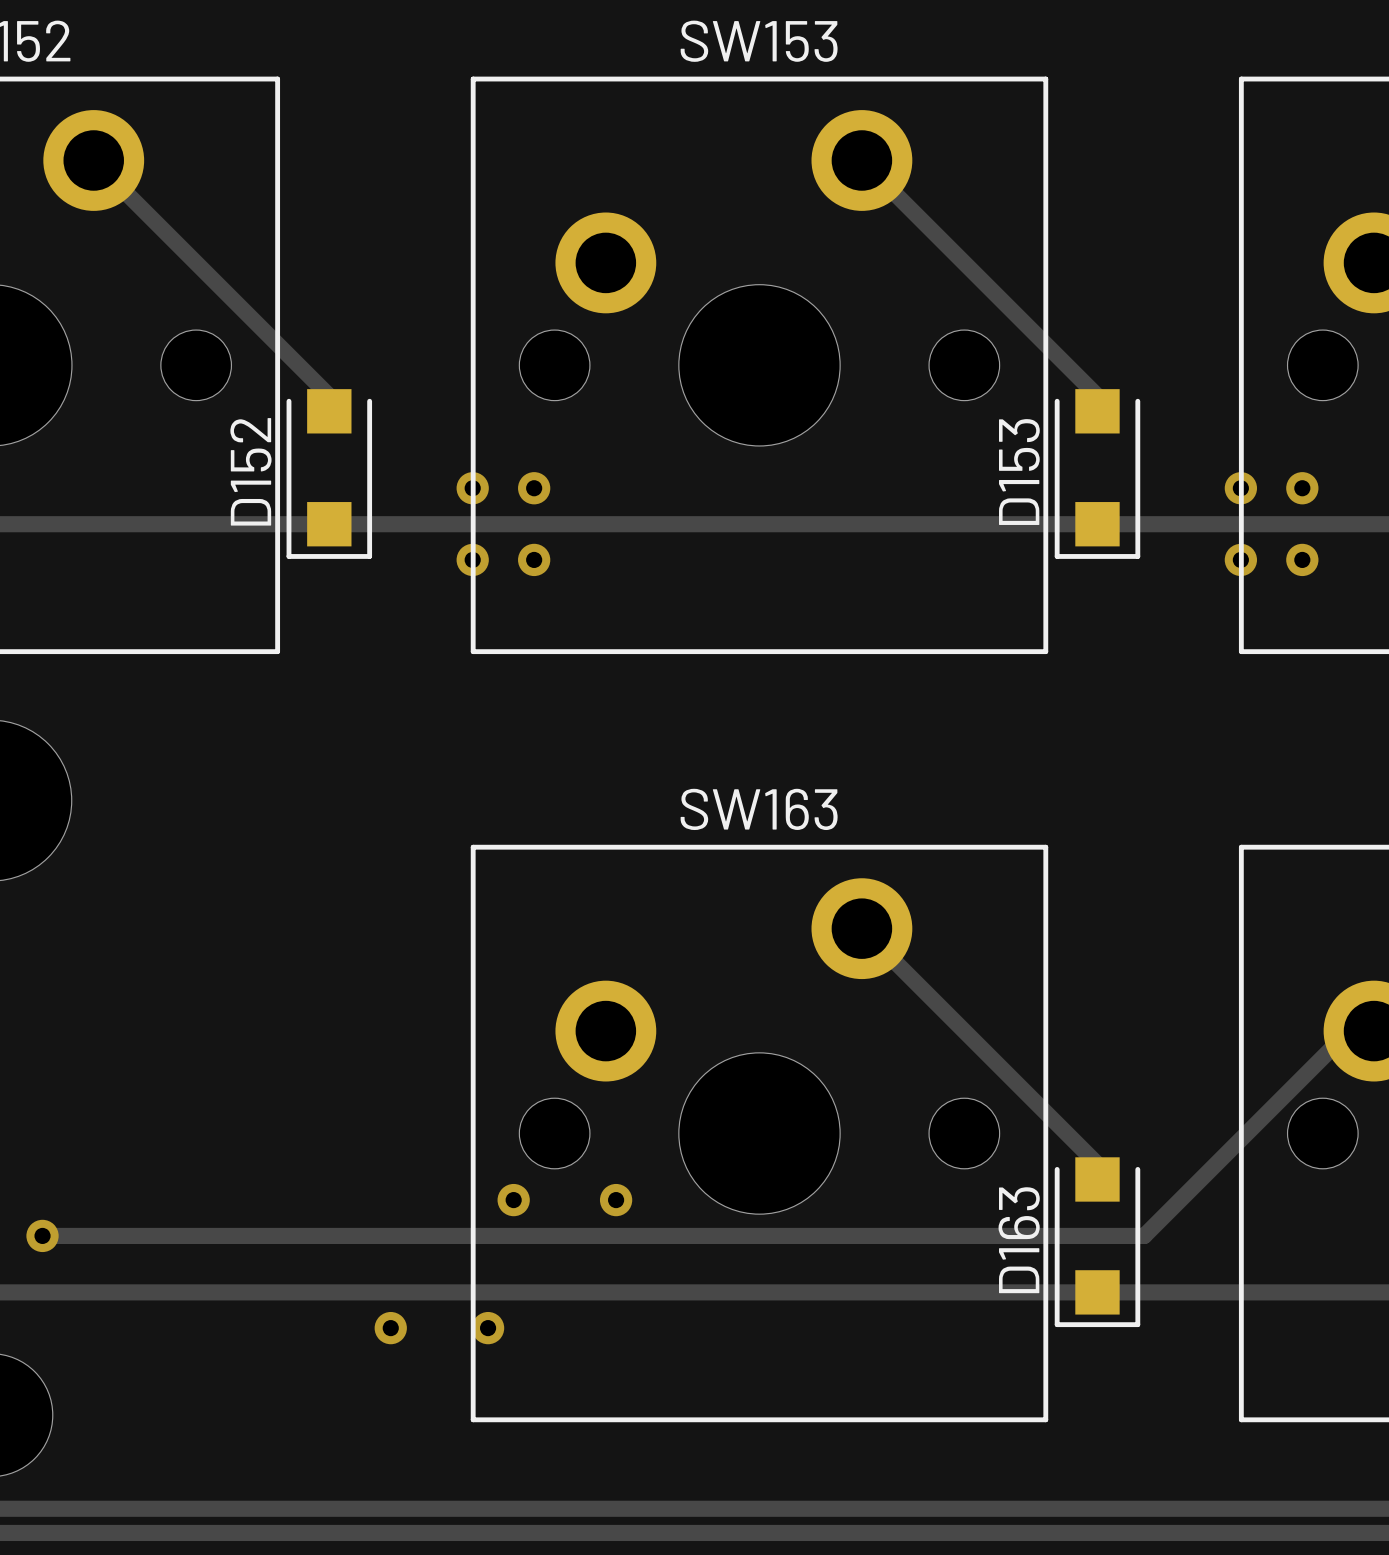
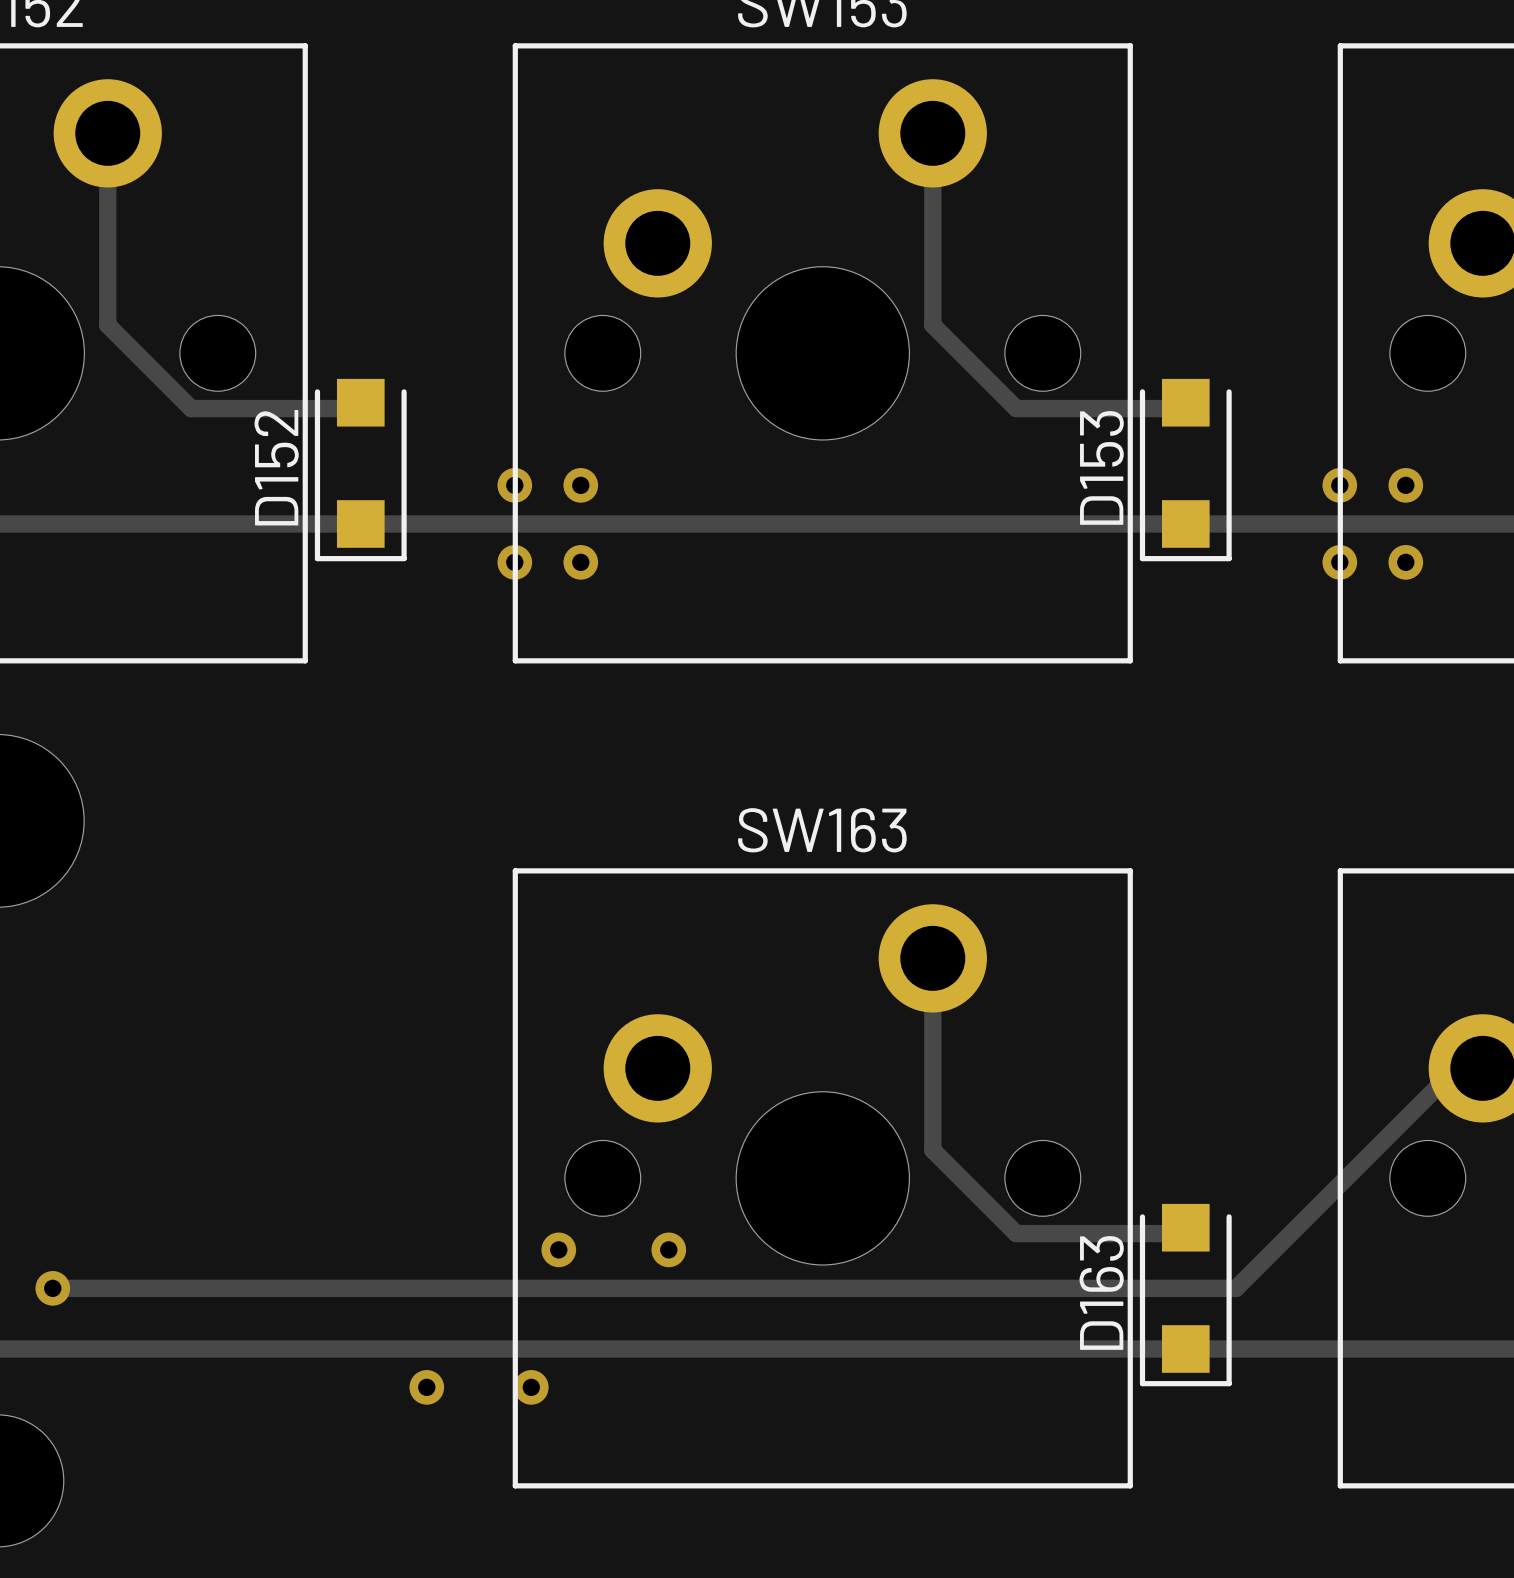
track: (93, 160) (329, 396) (329, 411) (324, 411) -> (107, 133) (107, 325) (191, 408) (354, 408) (360, 402)
track: (861, 160) (1097, 396) (1097, 411) (1092, 411) -> (932, 133) (932, 325) (1016, 408) (1179, 408) (1185, 402)
track: (861, 928) (1097, 1164) (1097, 1179) (1092, 1179) -> (932, 958) (932, 1150) (1016, 1233) (1179, 1233) (1185, 1227)

